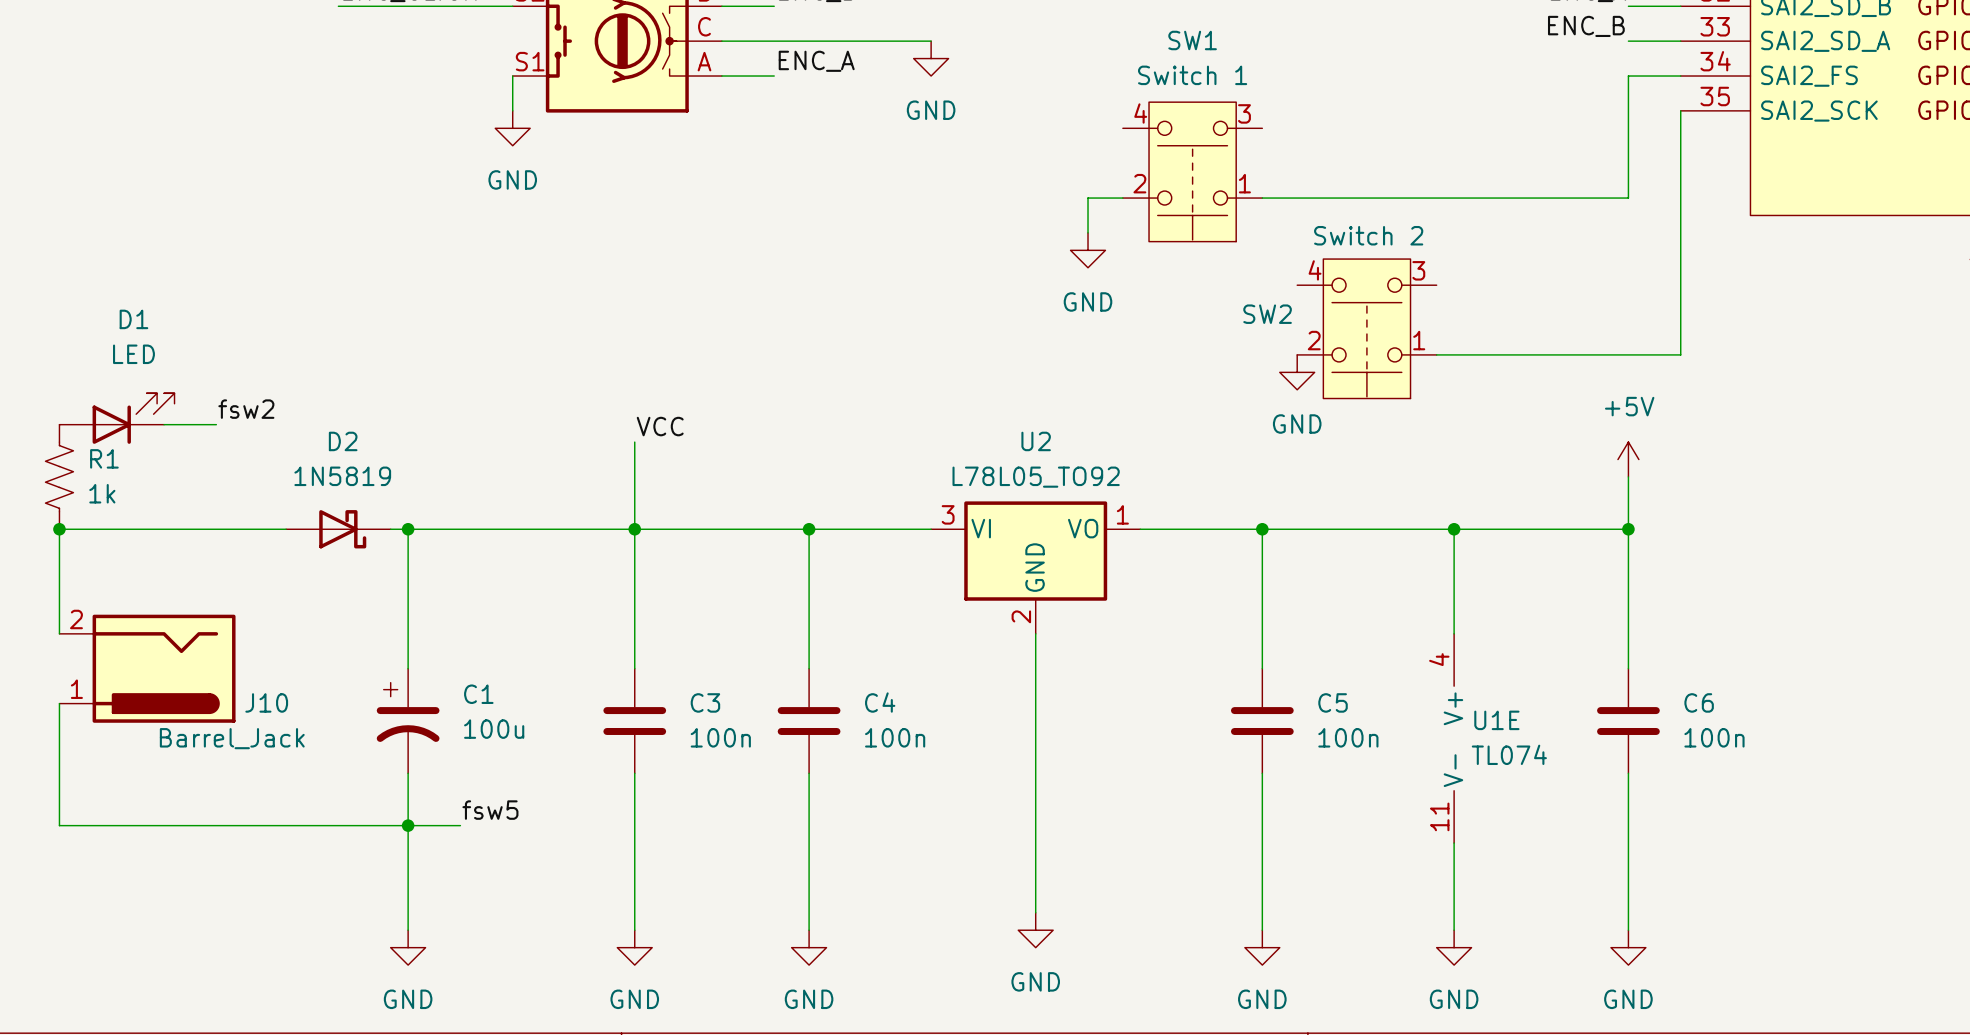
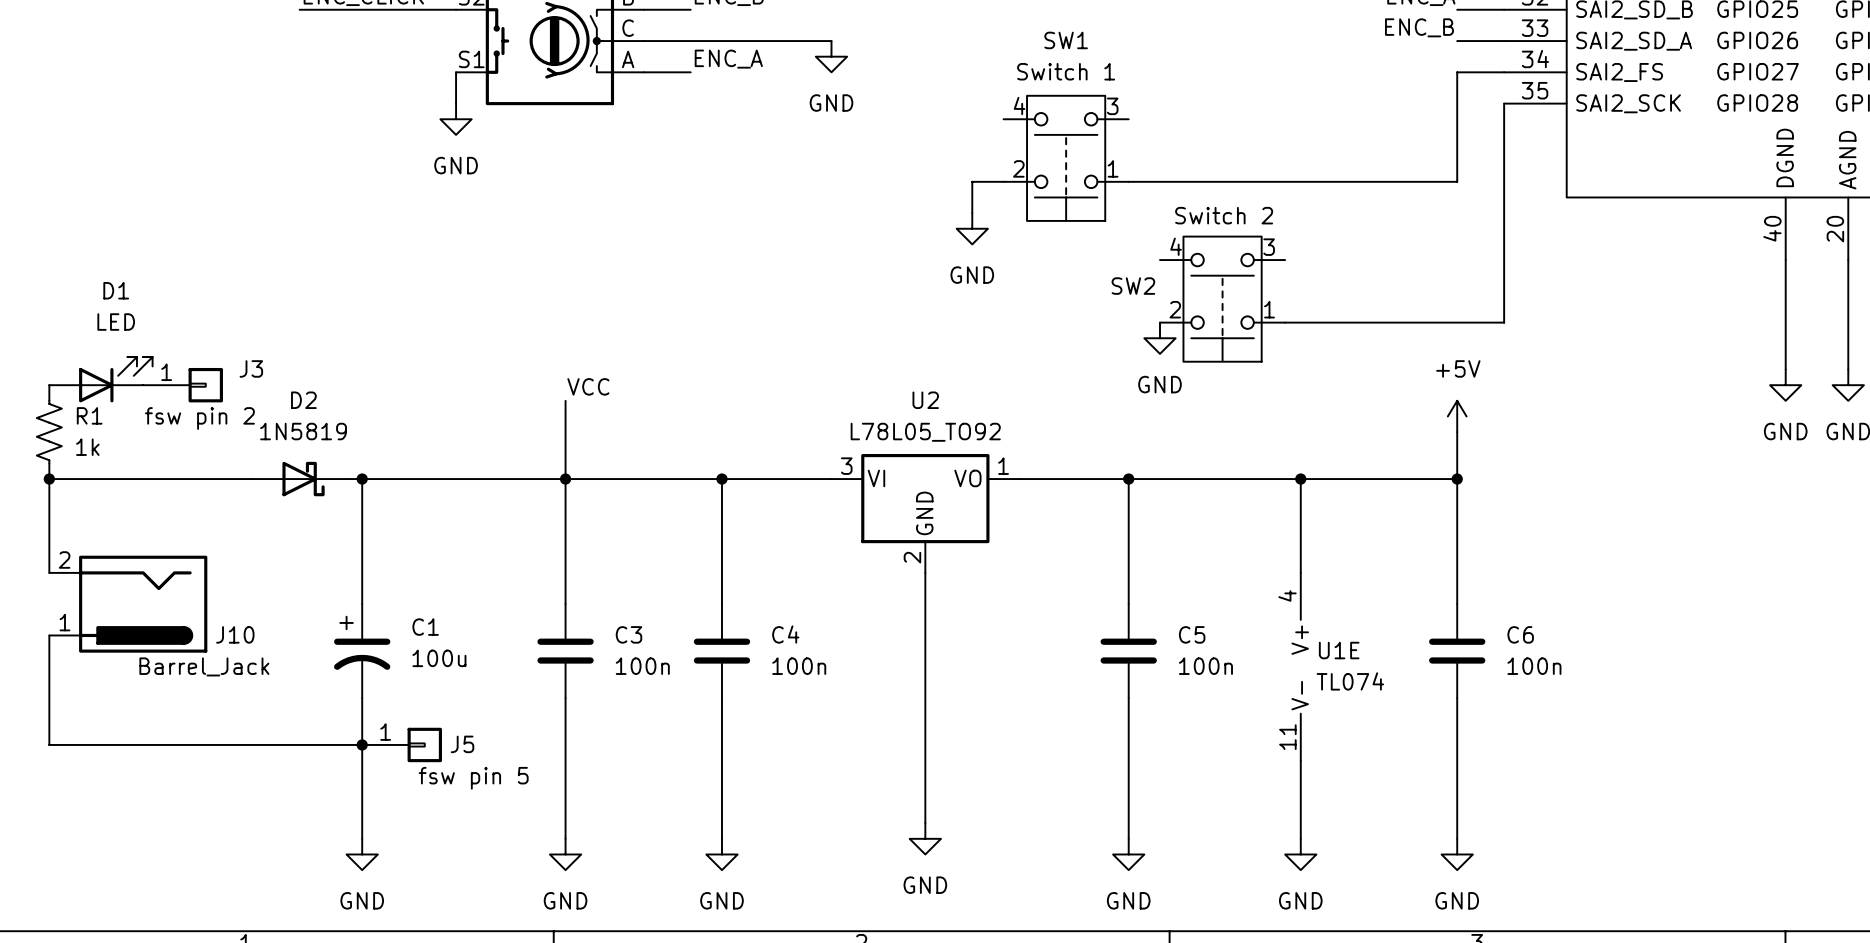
label: fsw2 (246, 409) -> none
J3: none -> fsw pin 2 (183, 385)
label: fsw5 (490, 810) -> none
J5: none -> fsw pin 5 (402, 744)

